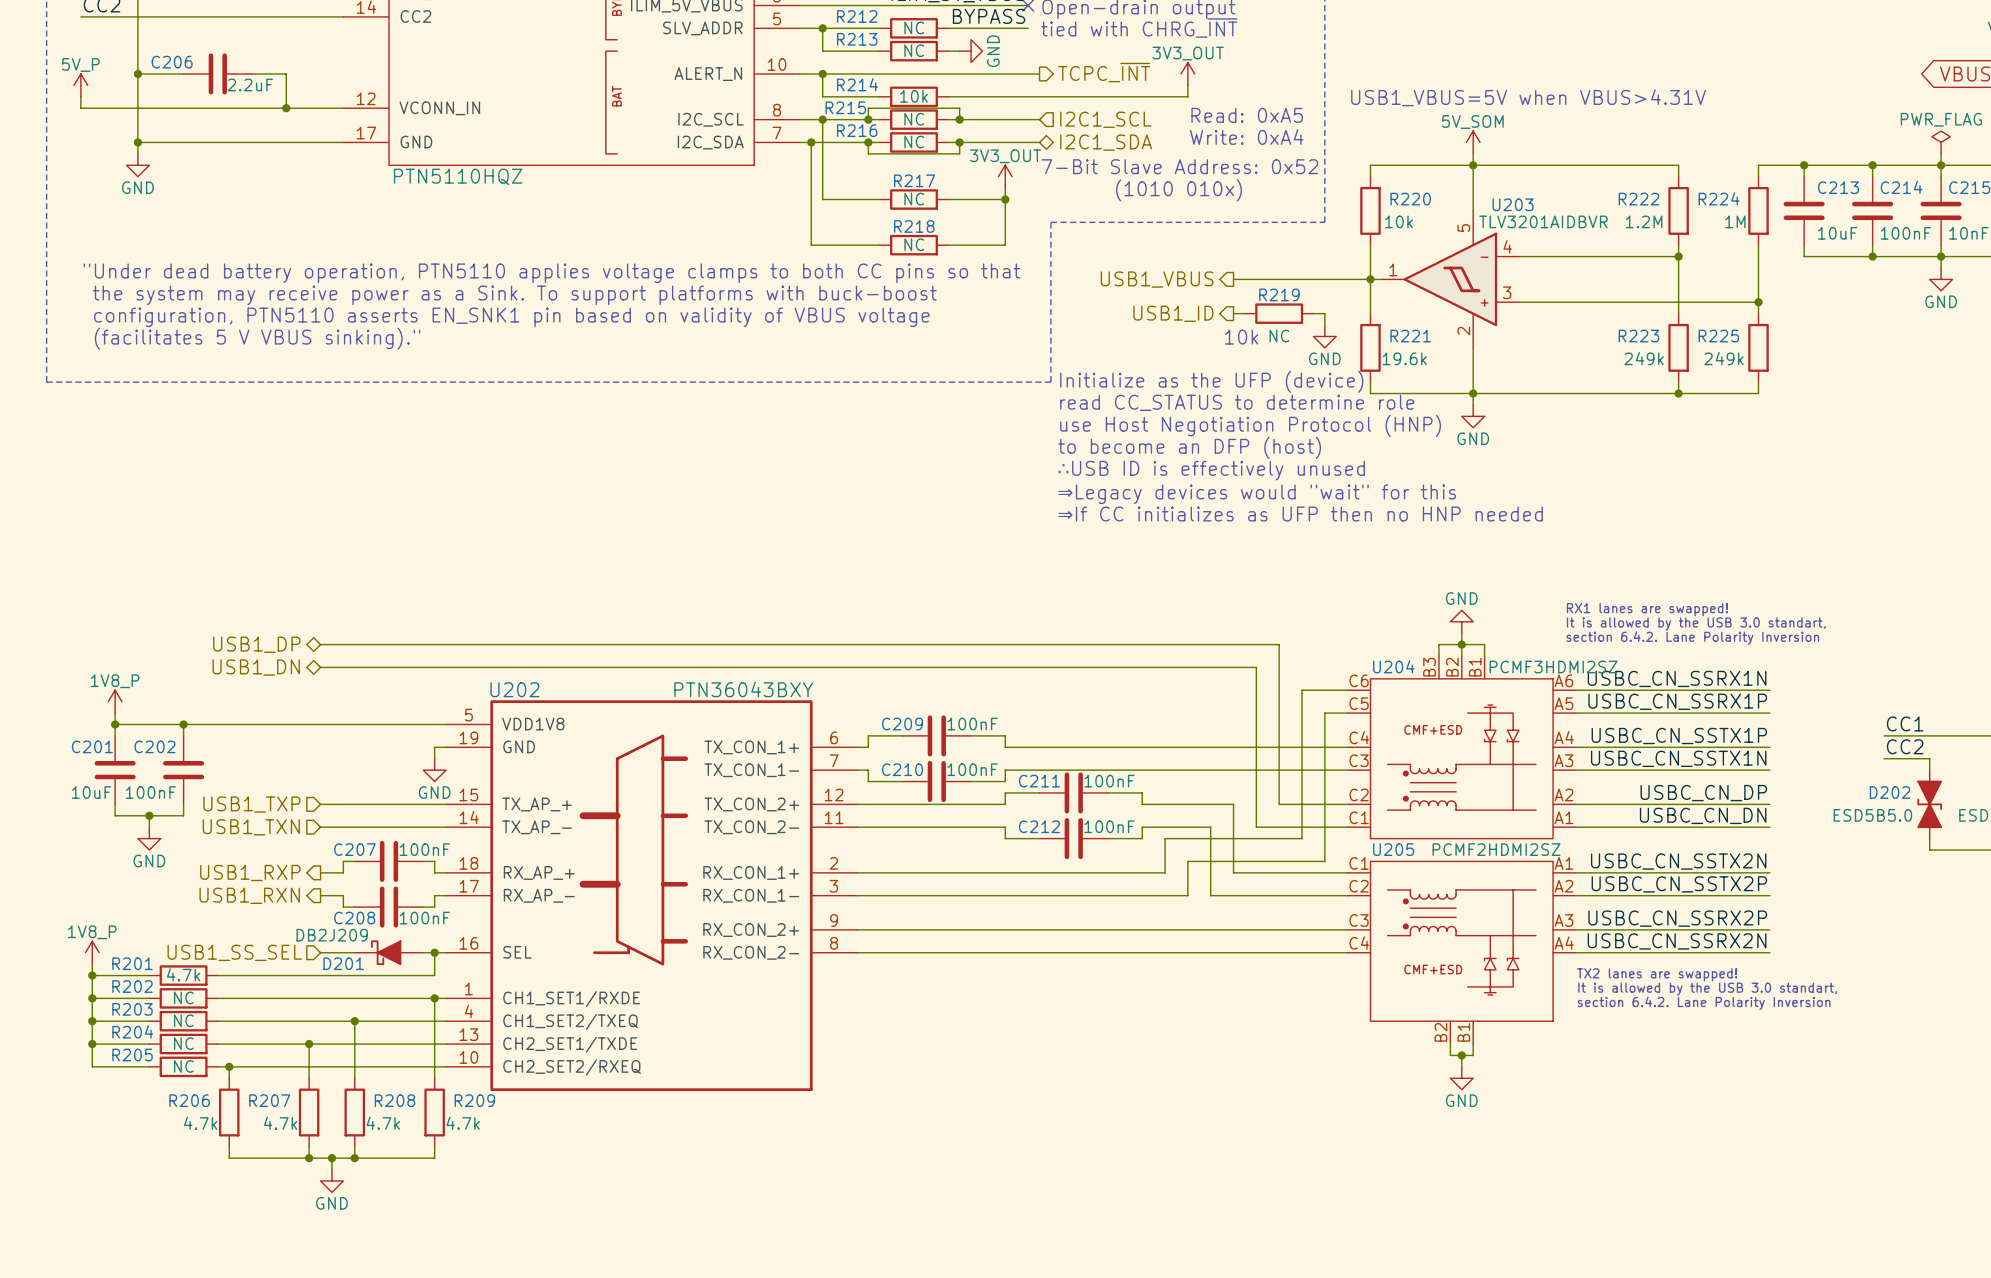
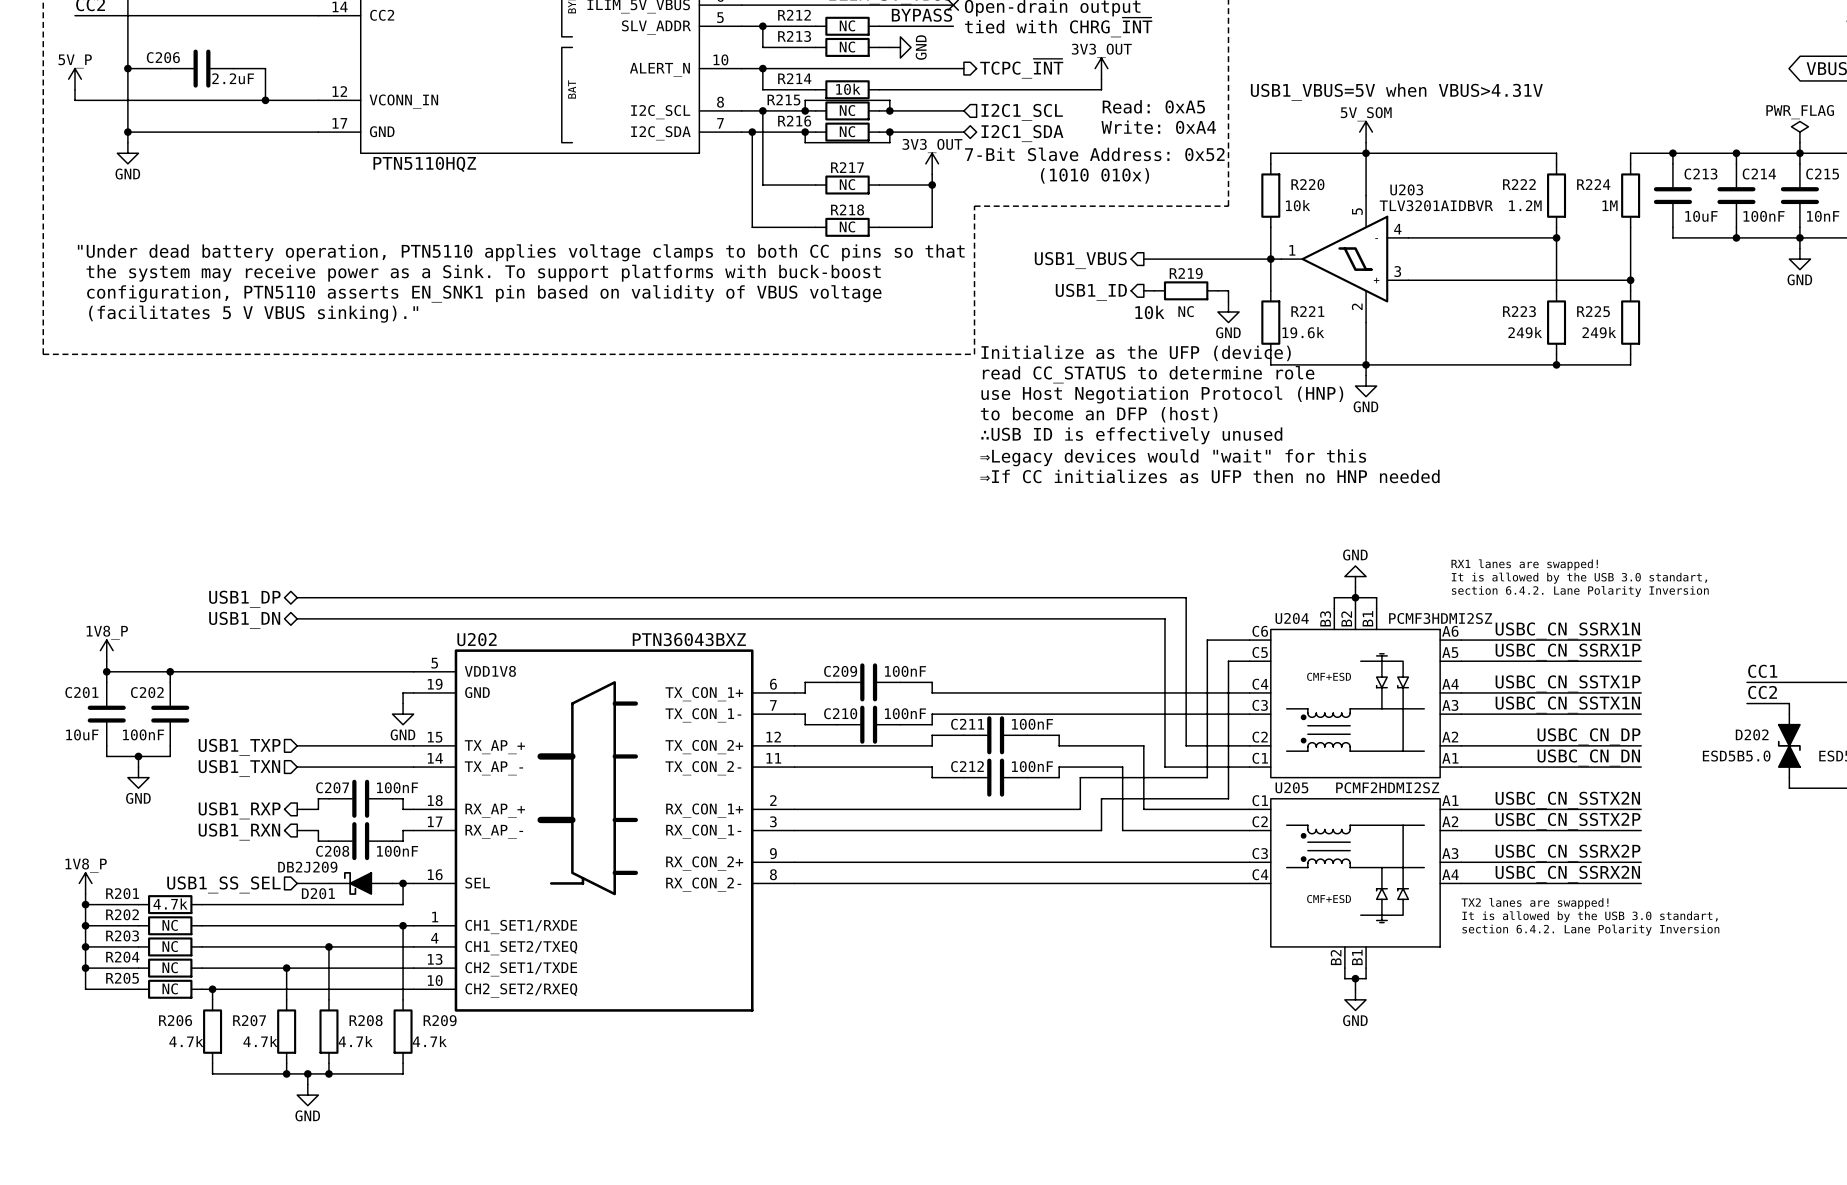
U202 value: PTN36043BXY (743, 689) -> PTN36043BXZ (689, 639)

